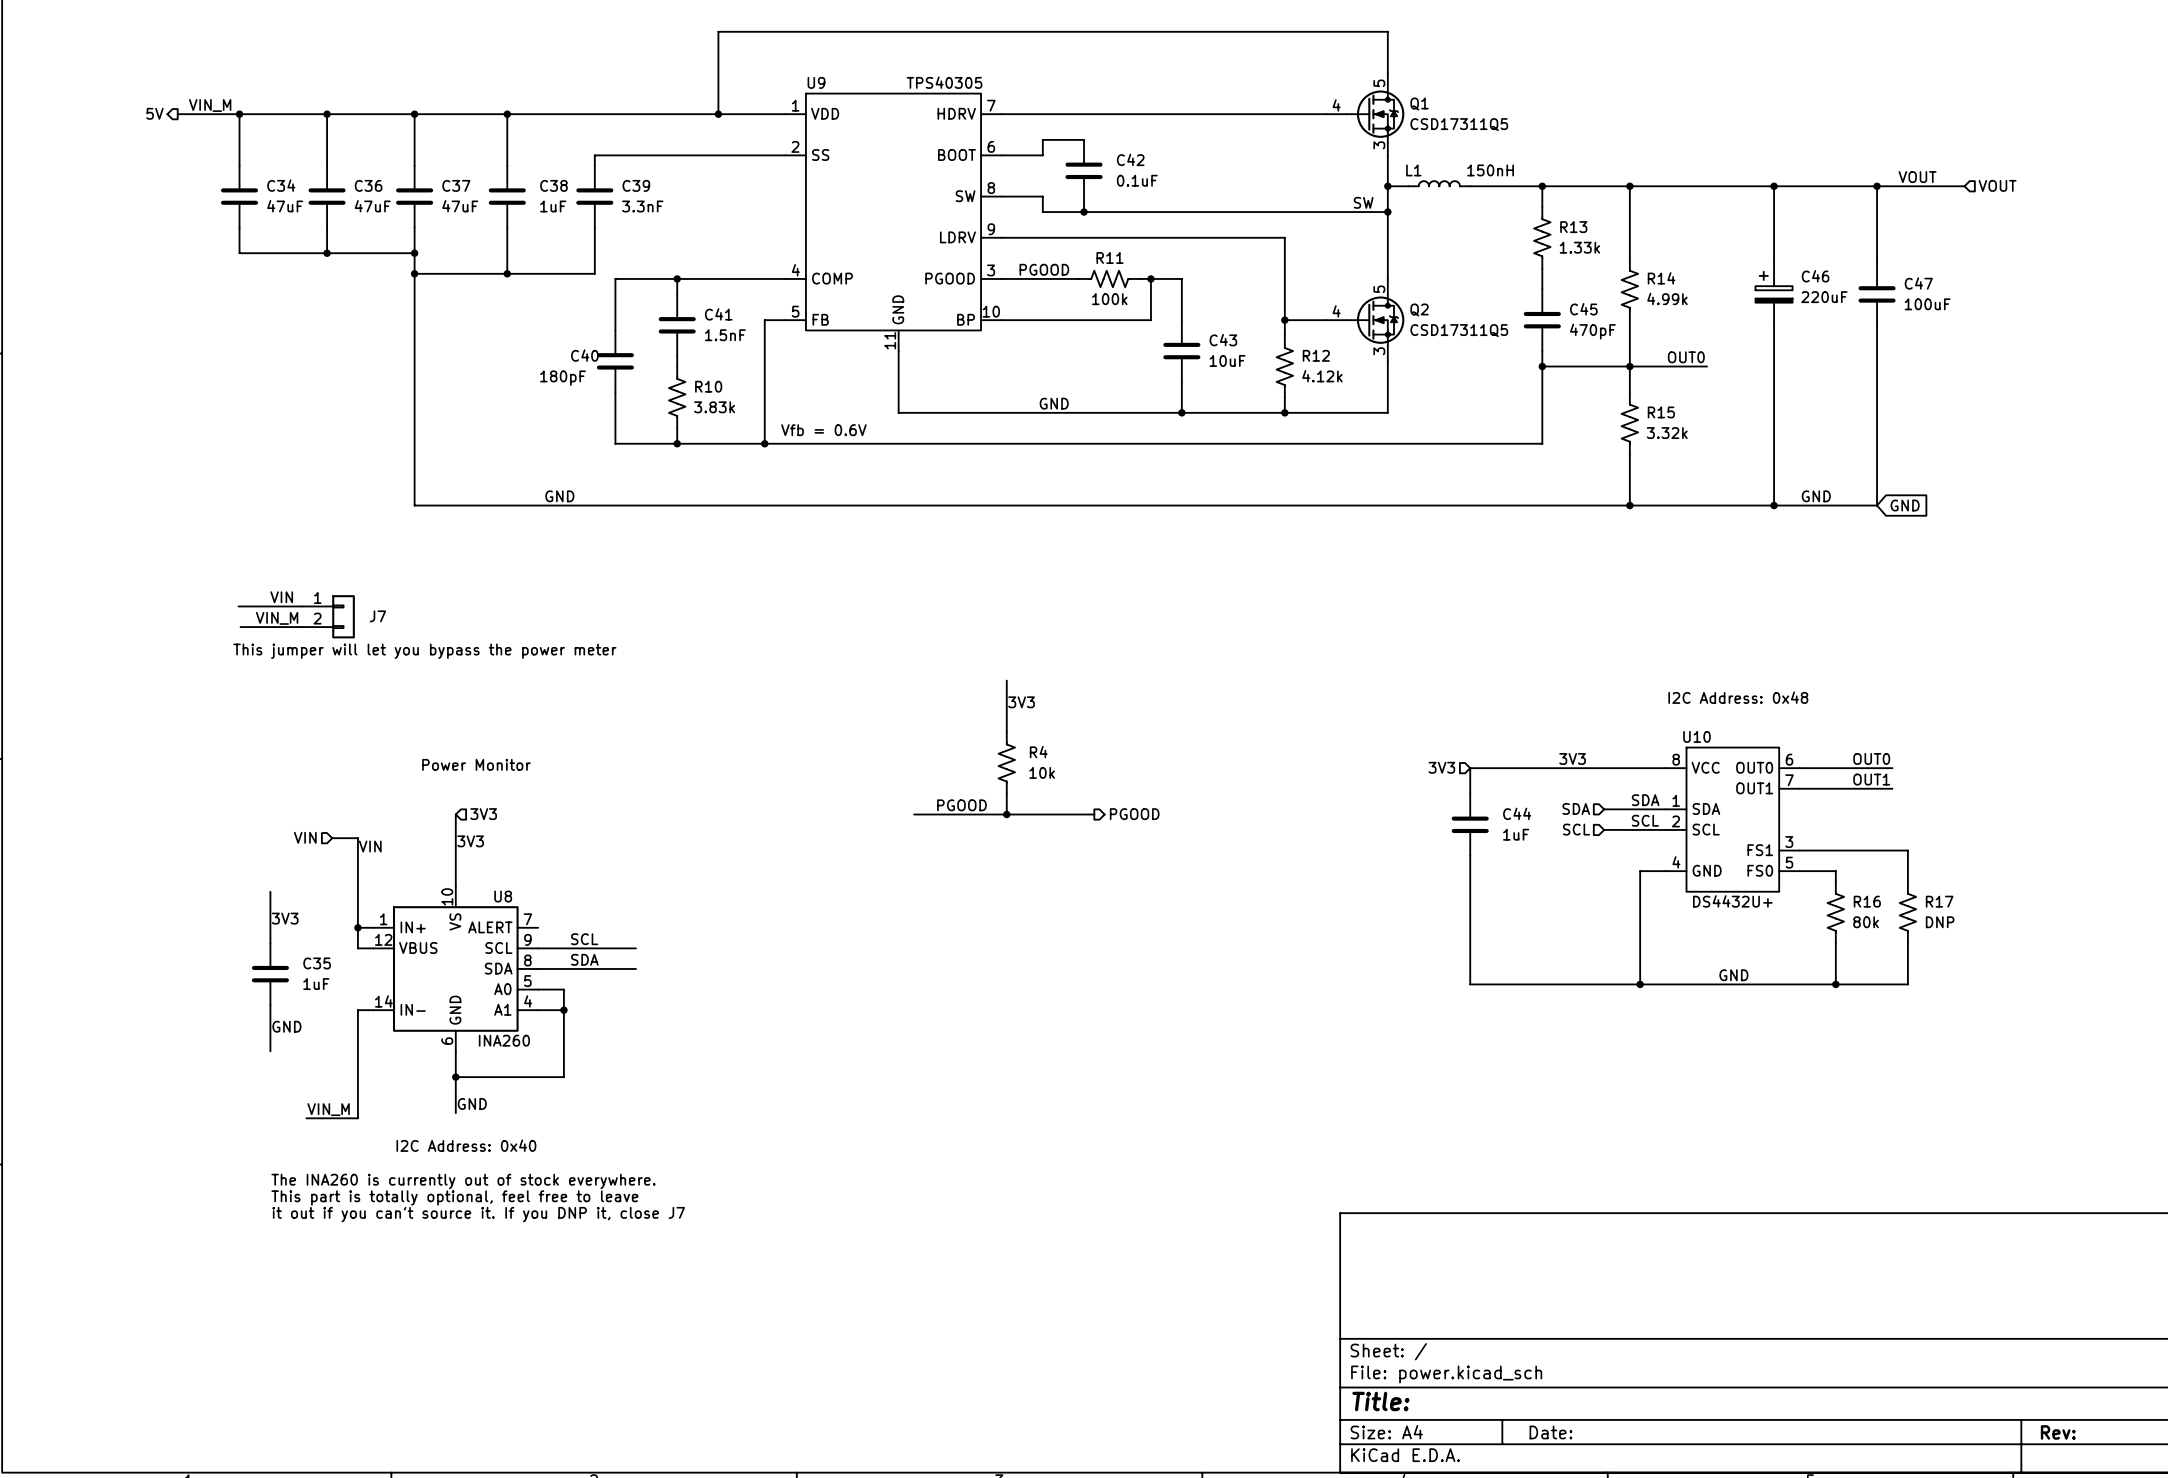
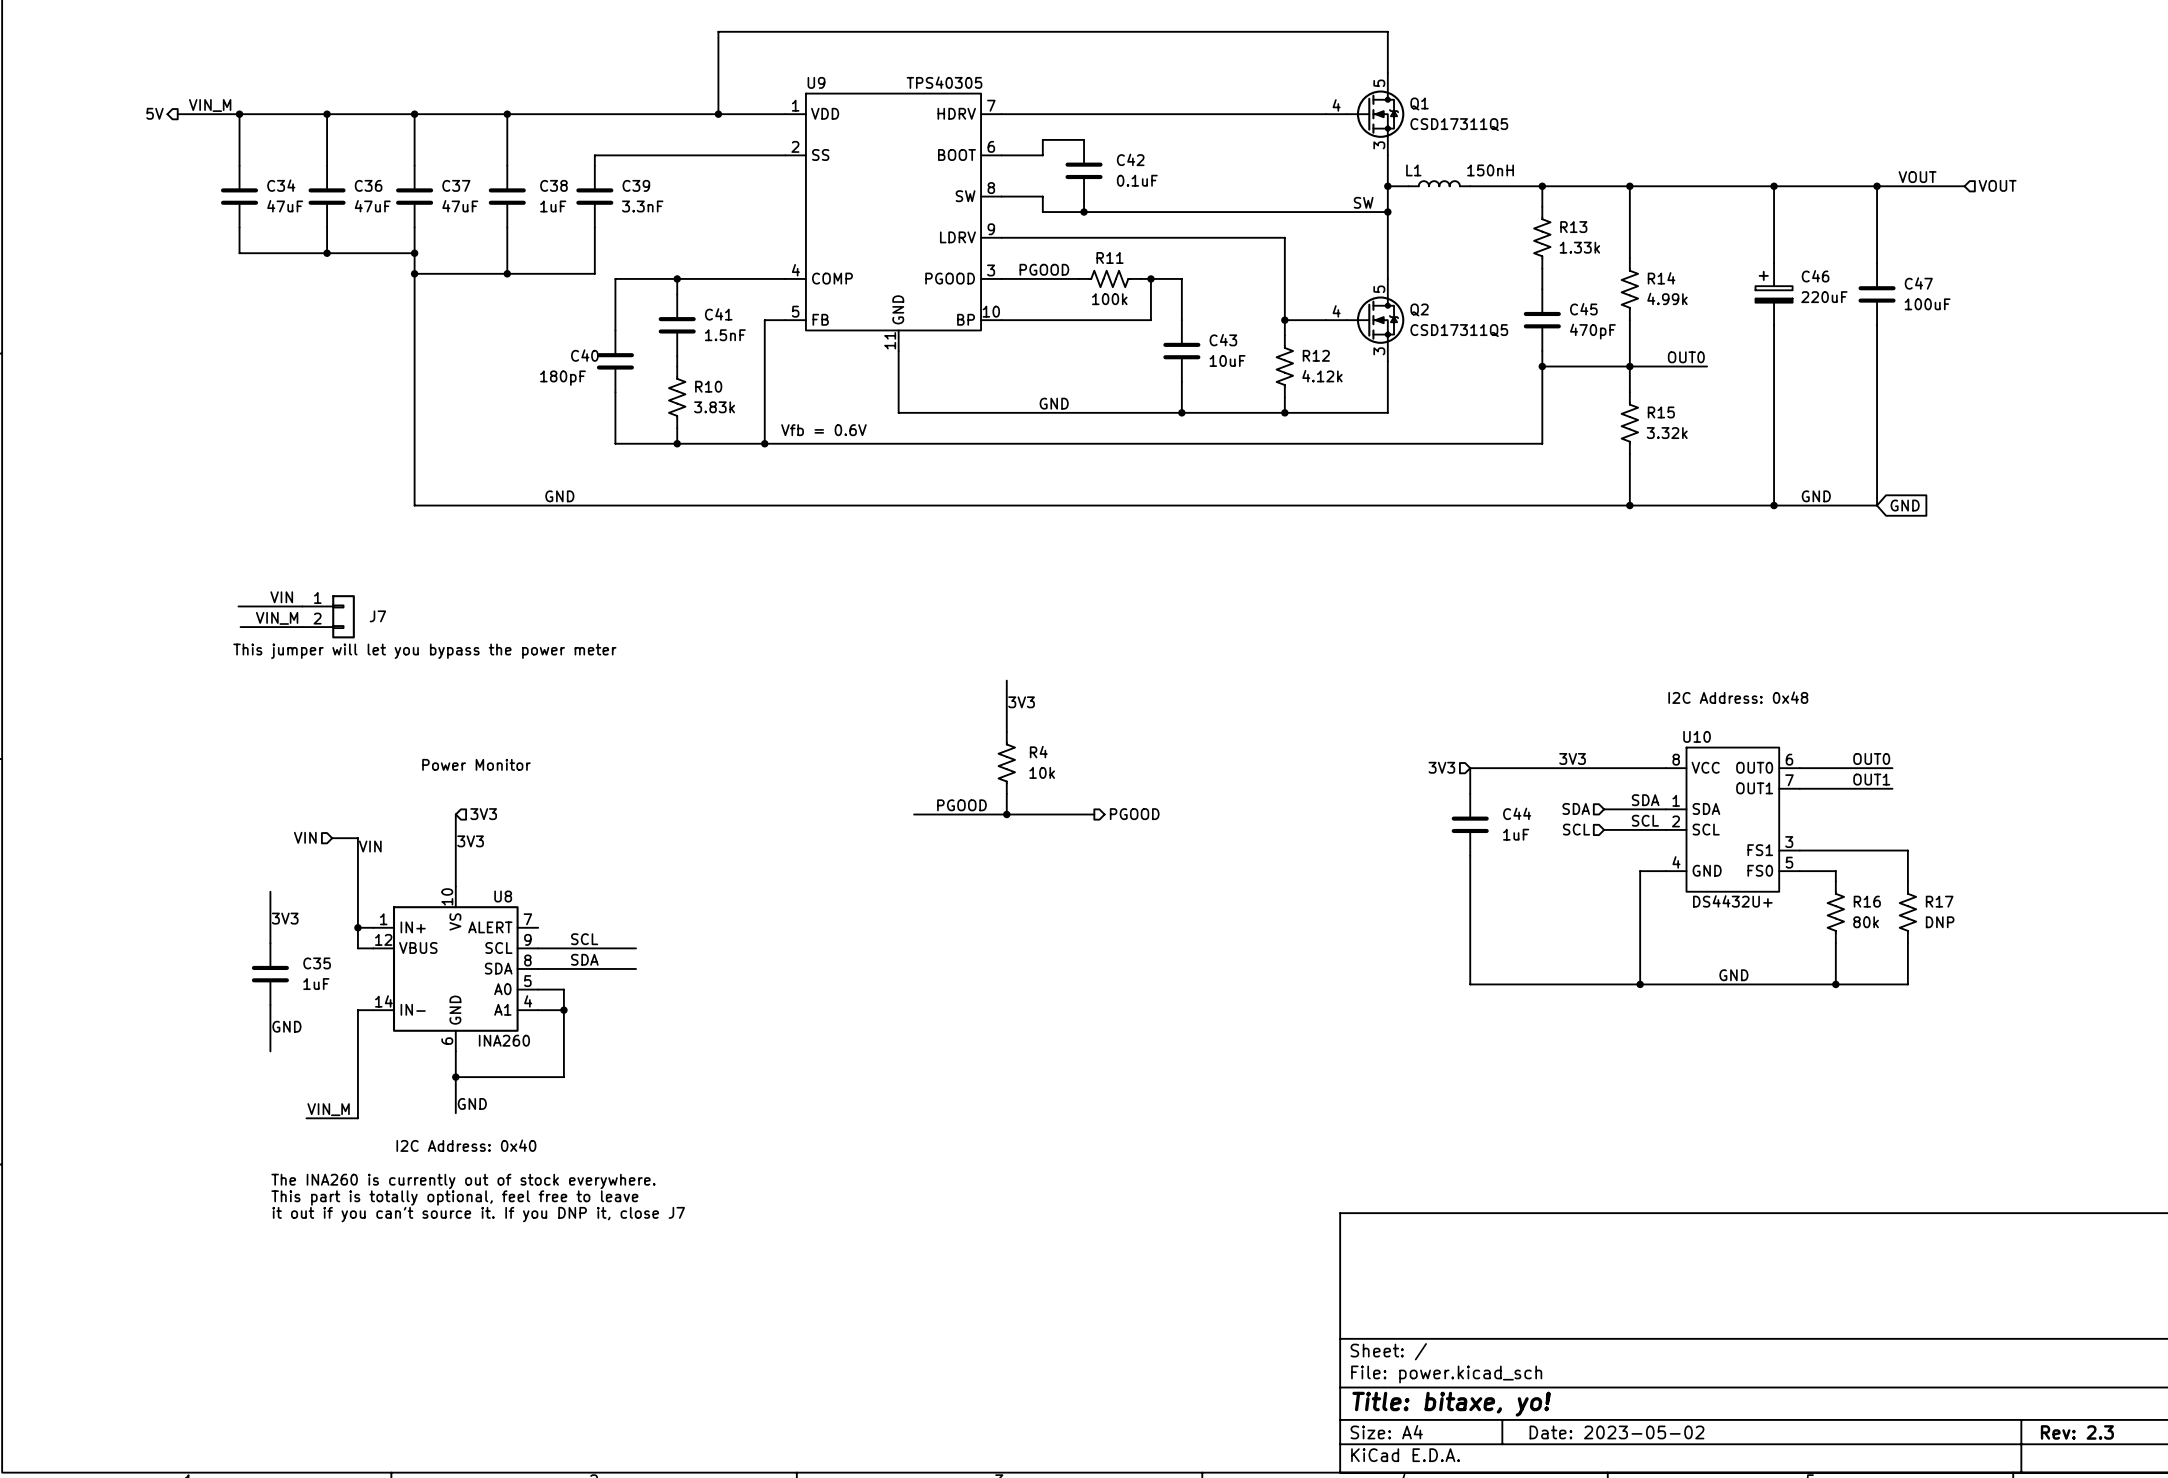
title block: Title: (1380, 1401) -> Title: bitaxe, yo! (1451, 1404)
title block: Date: (1550, 1432) -> Date: 2023-05-02 (1616, 1432)
title block: Rev: (2058, 1432) -> Rev: 2.3 (2077, 1432)

